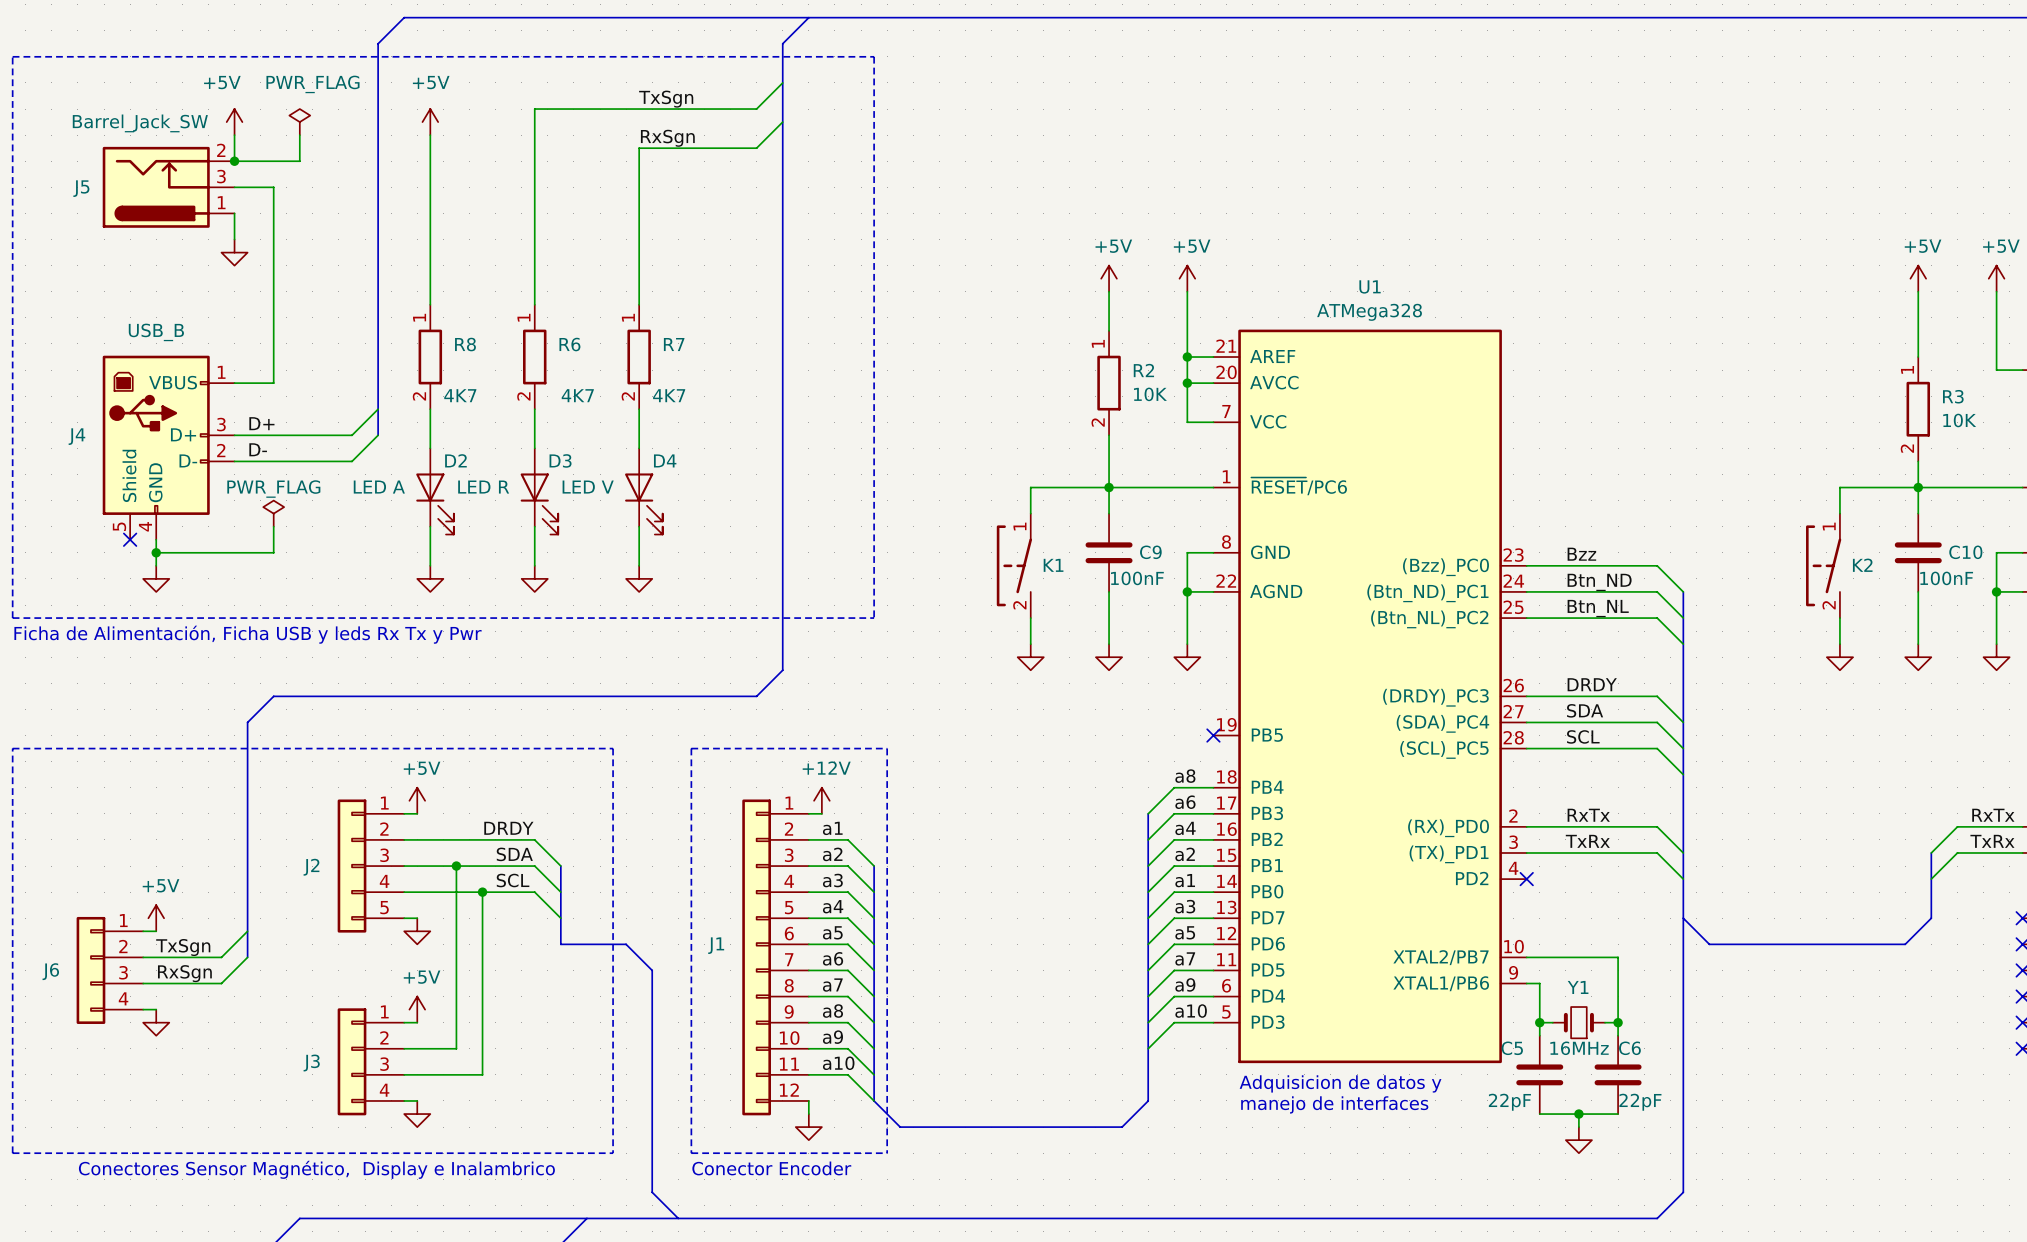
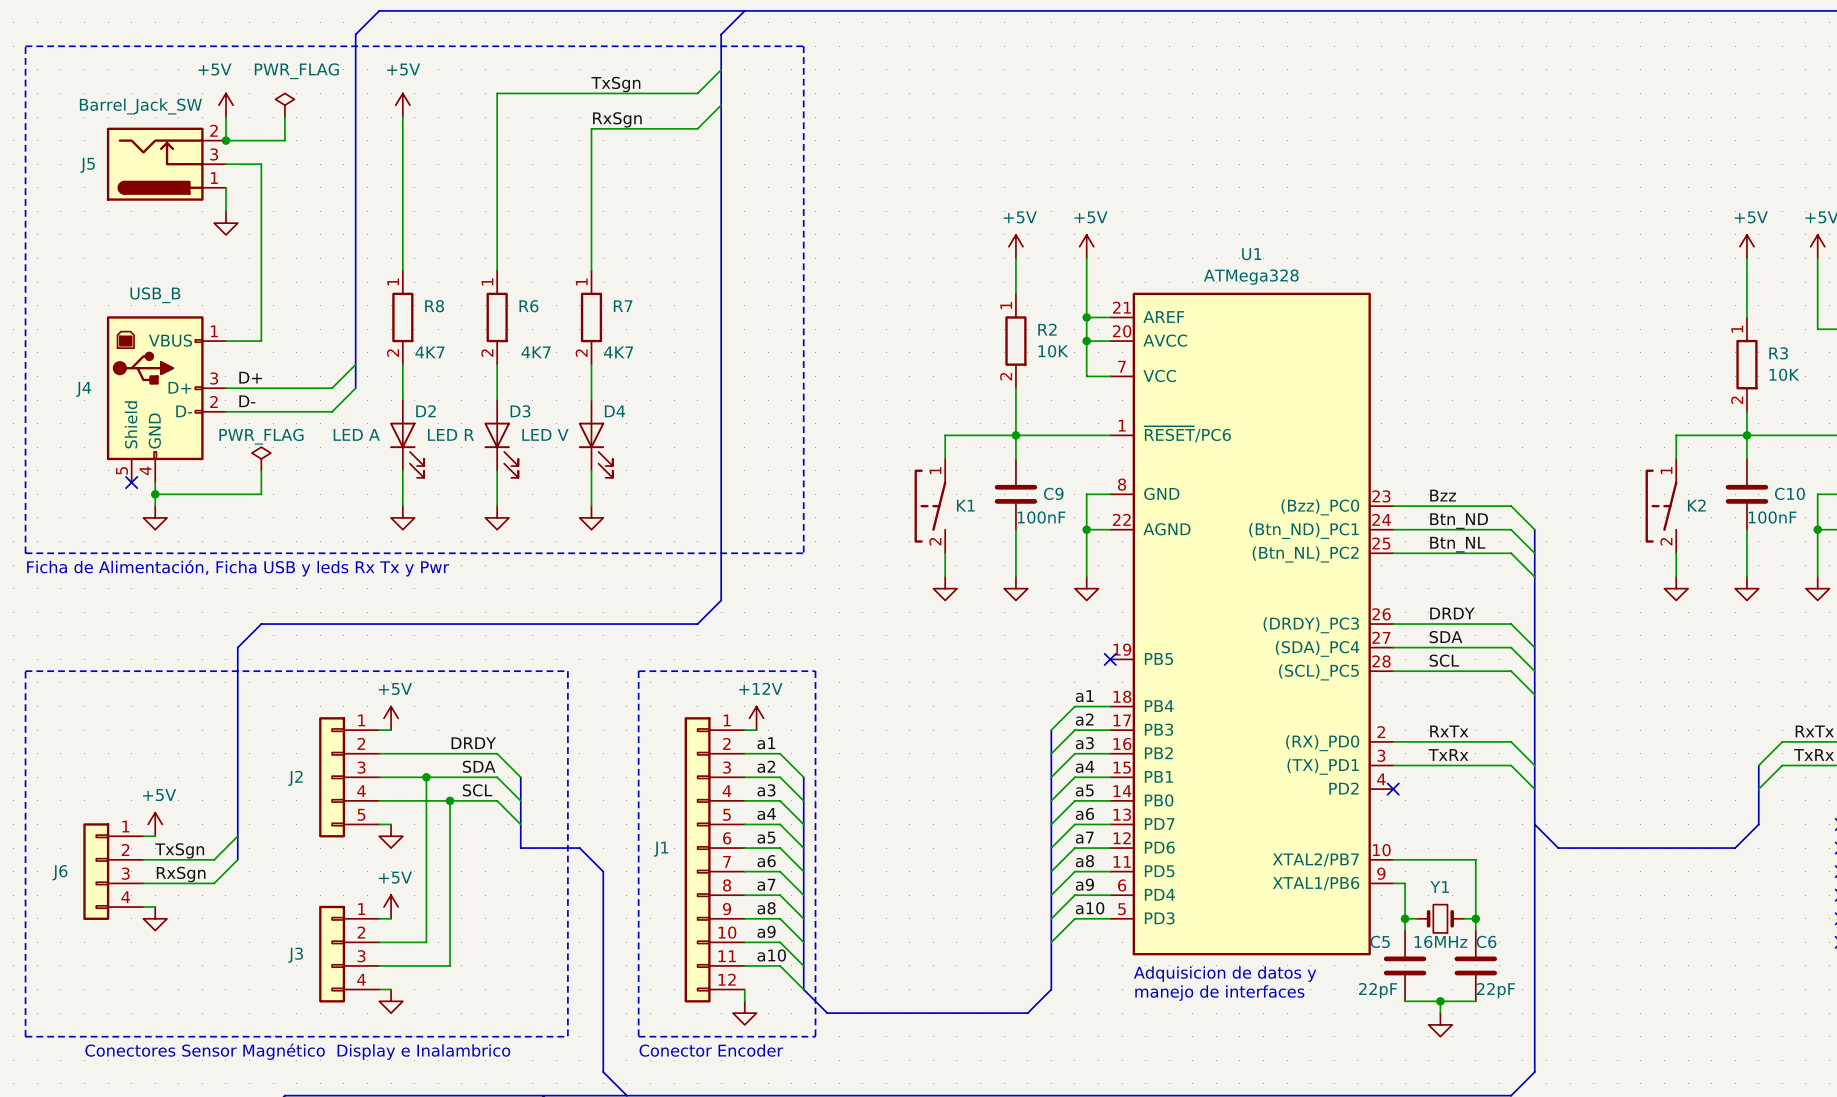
label: a8 (1185, 776) -> a1 (1084, 696)
label: a6 (1185, 802) -> a2 (1084, 719)
label: a4 (1185, 828) -> a3 (1084, 743)
label: a2 (1185, 854) -> a4 (1085, 766)
label: a1 (1185, 880) -> a5 (1084, 790)
label: a3 (1185, 906) -> a6 (1084, 813)
label: a5 (1185, 932) -> a7 (1084, 837)
label: a7 (1185, 958) -> a8 (1084, 861)
text: Conectores Sensor Magnético, Display e Inalambrico (316, 1169) -> Conectores Sensor Magnético Display e Inalambrico (297, 1051)

